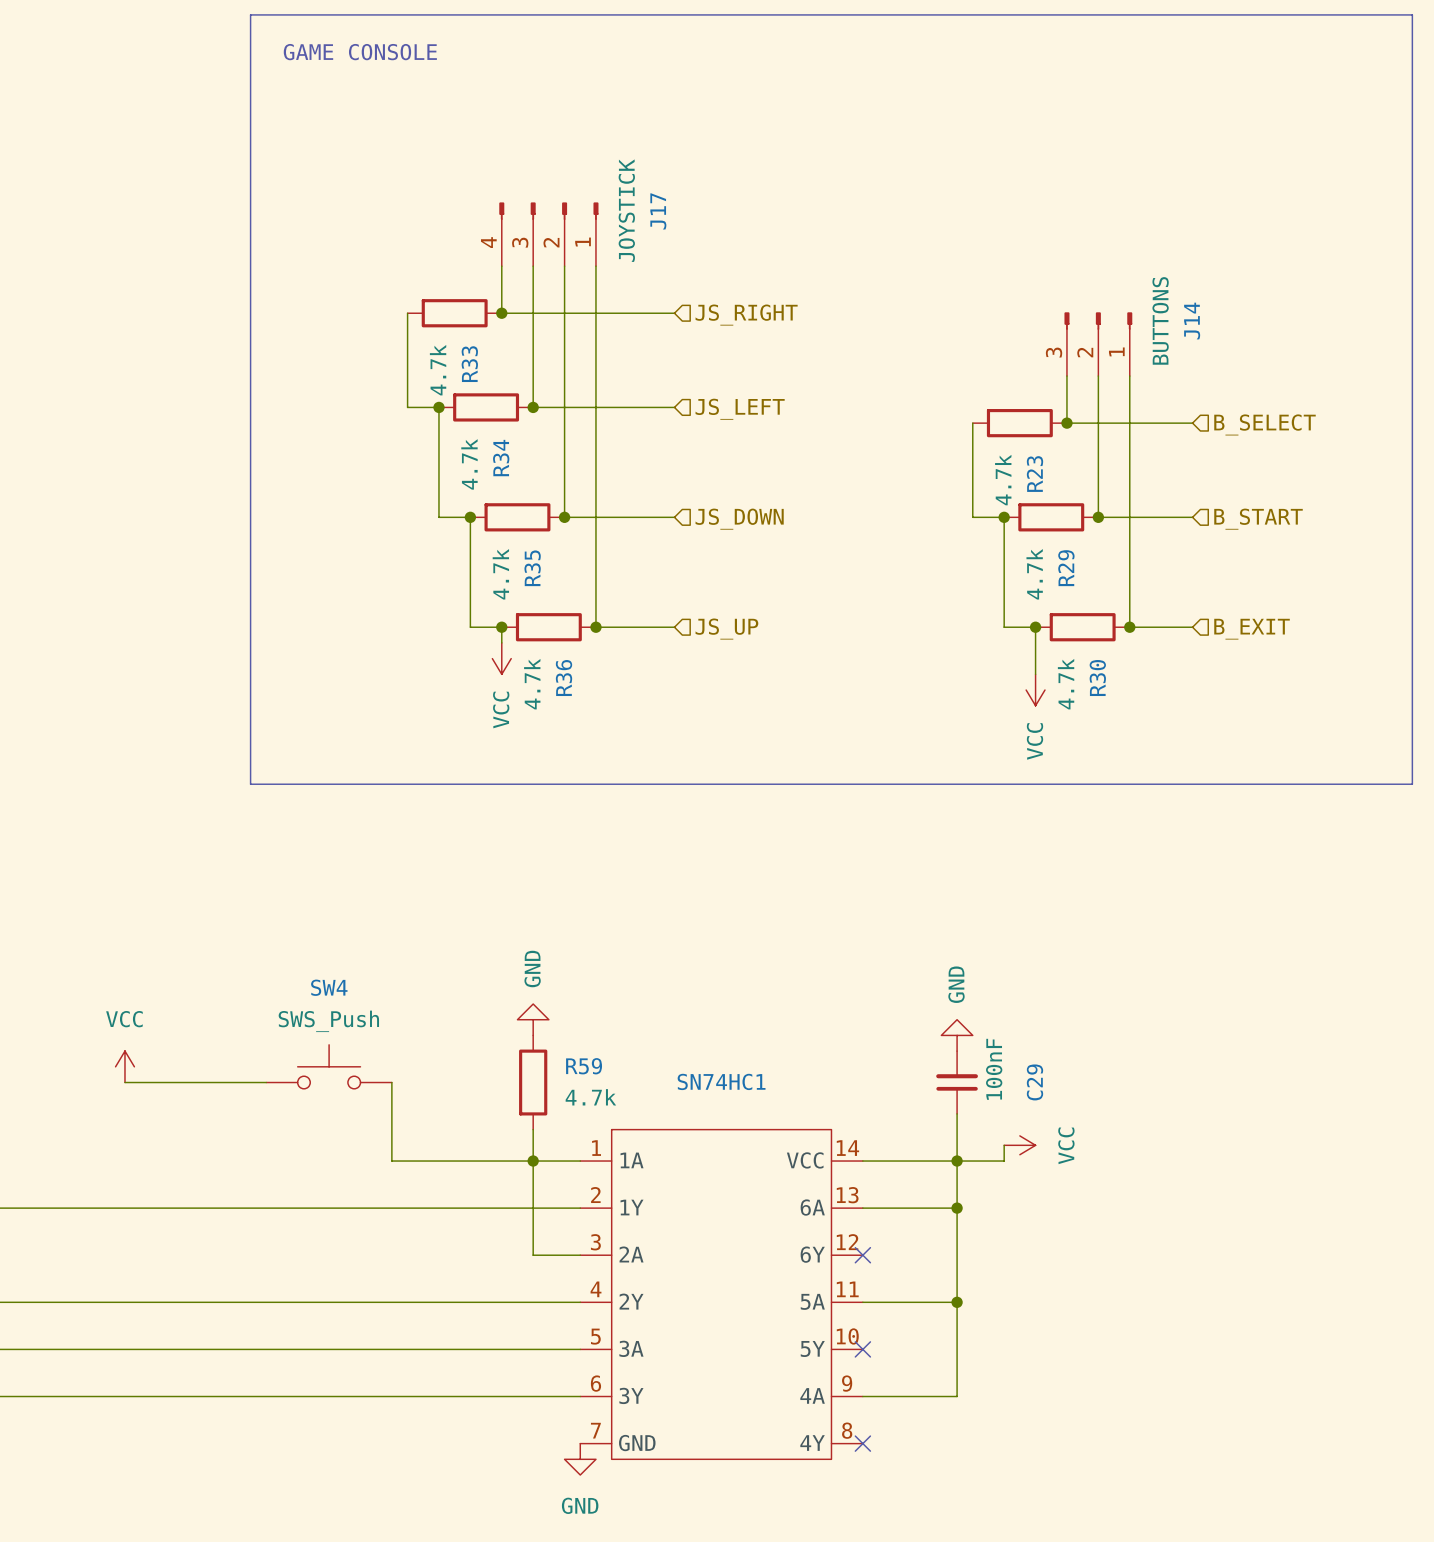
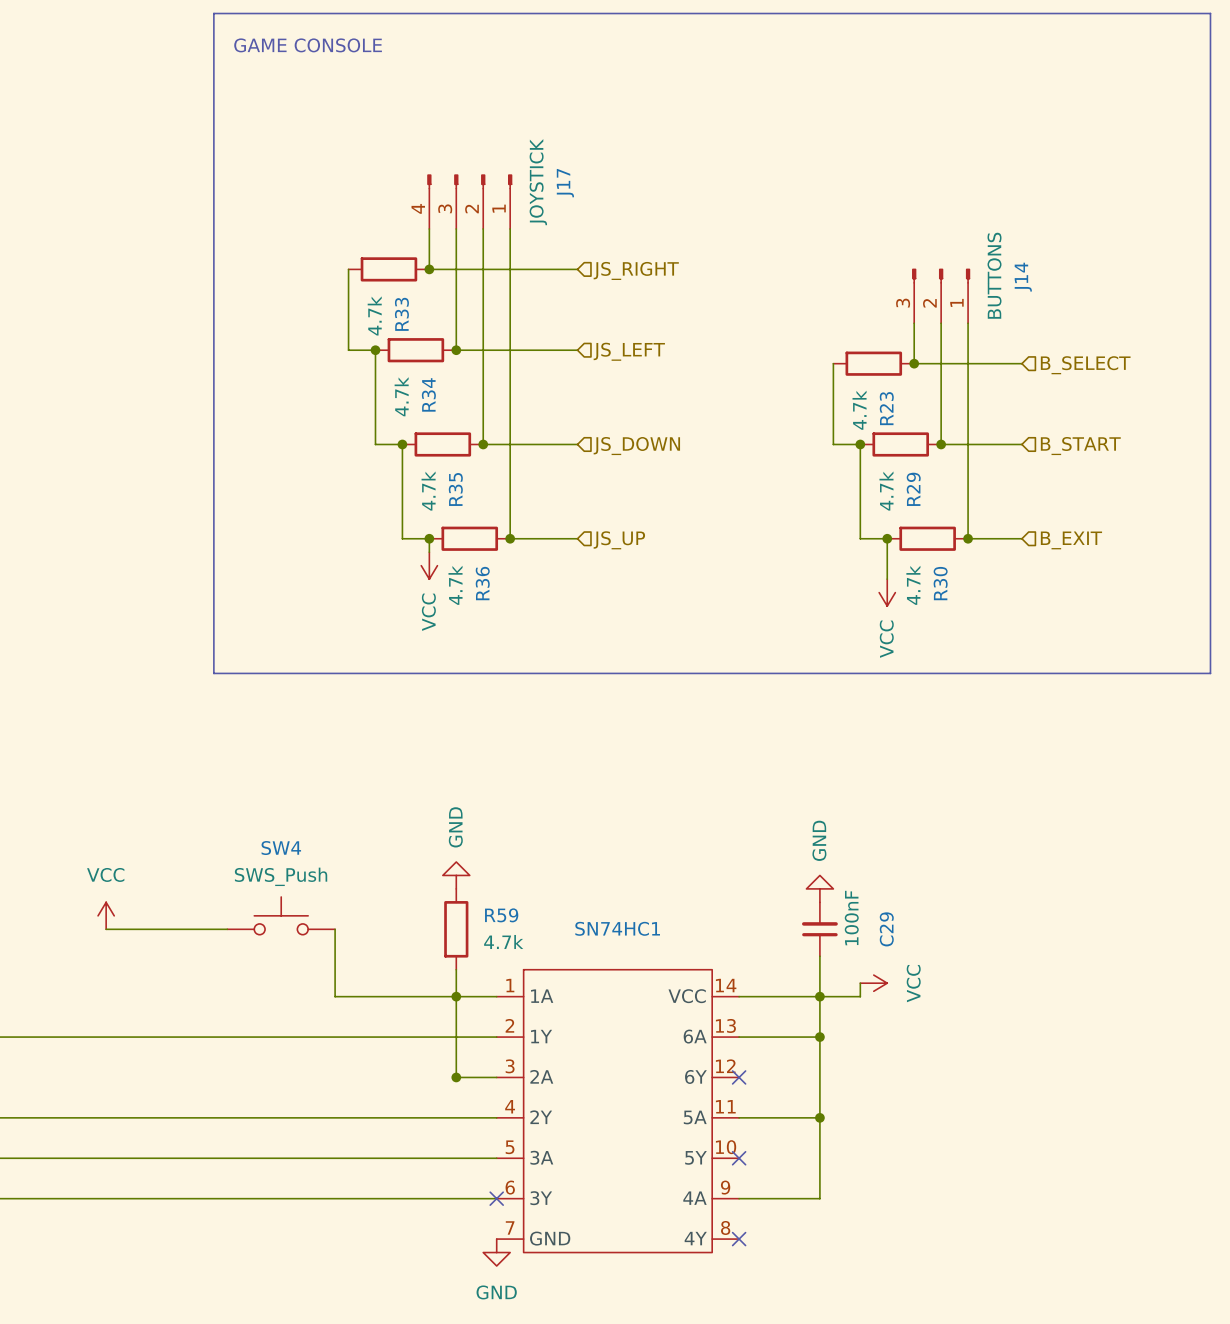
junction: none -> (456, 1077)
no-connect mark: none -> (496, 1198)

